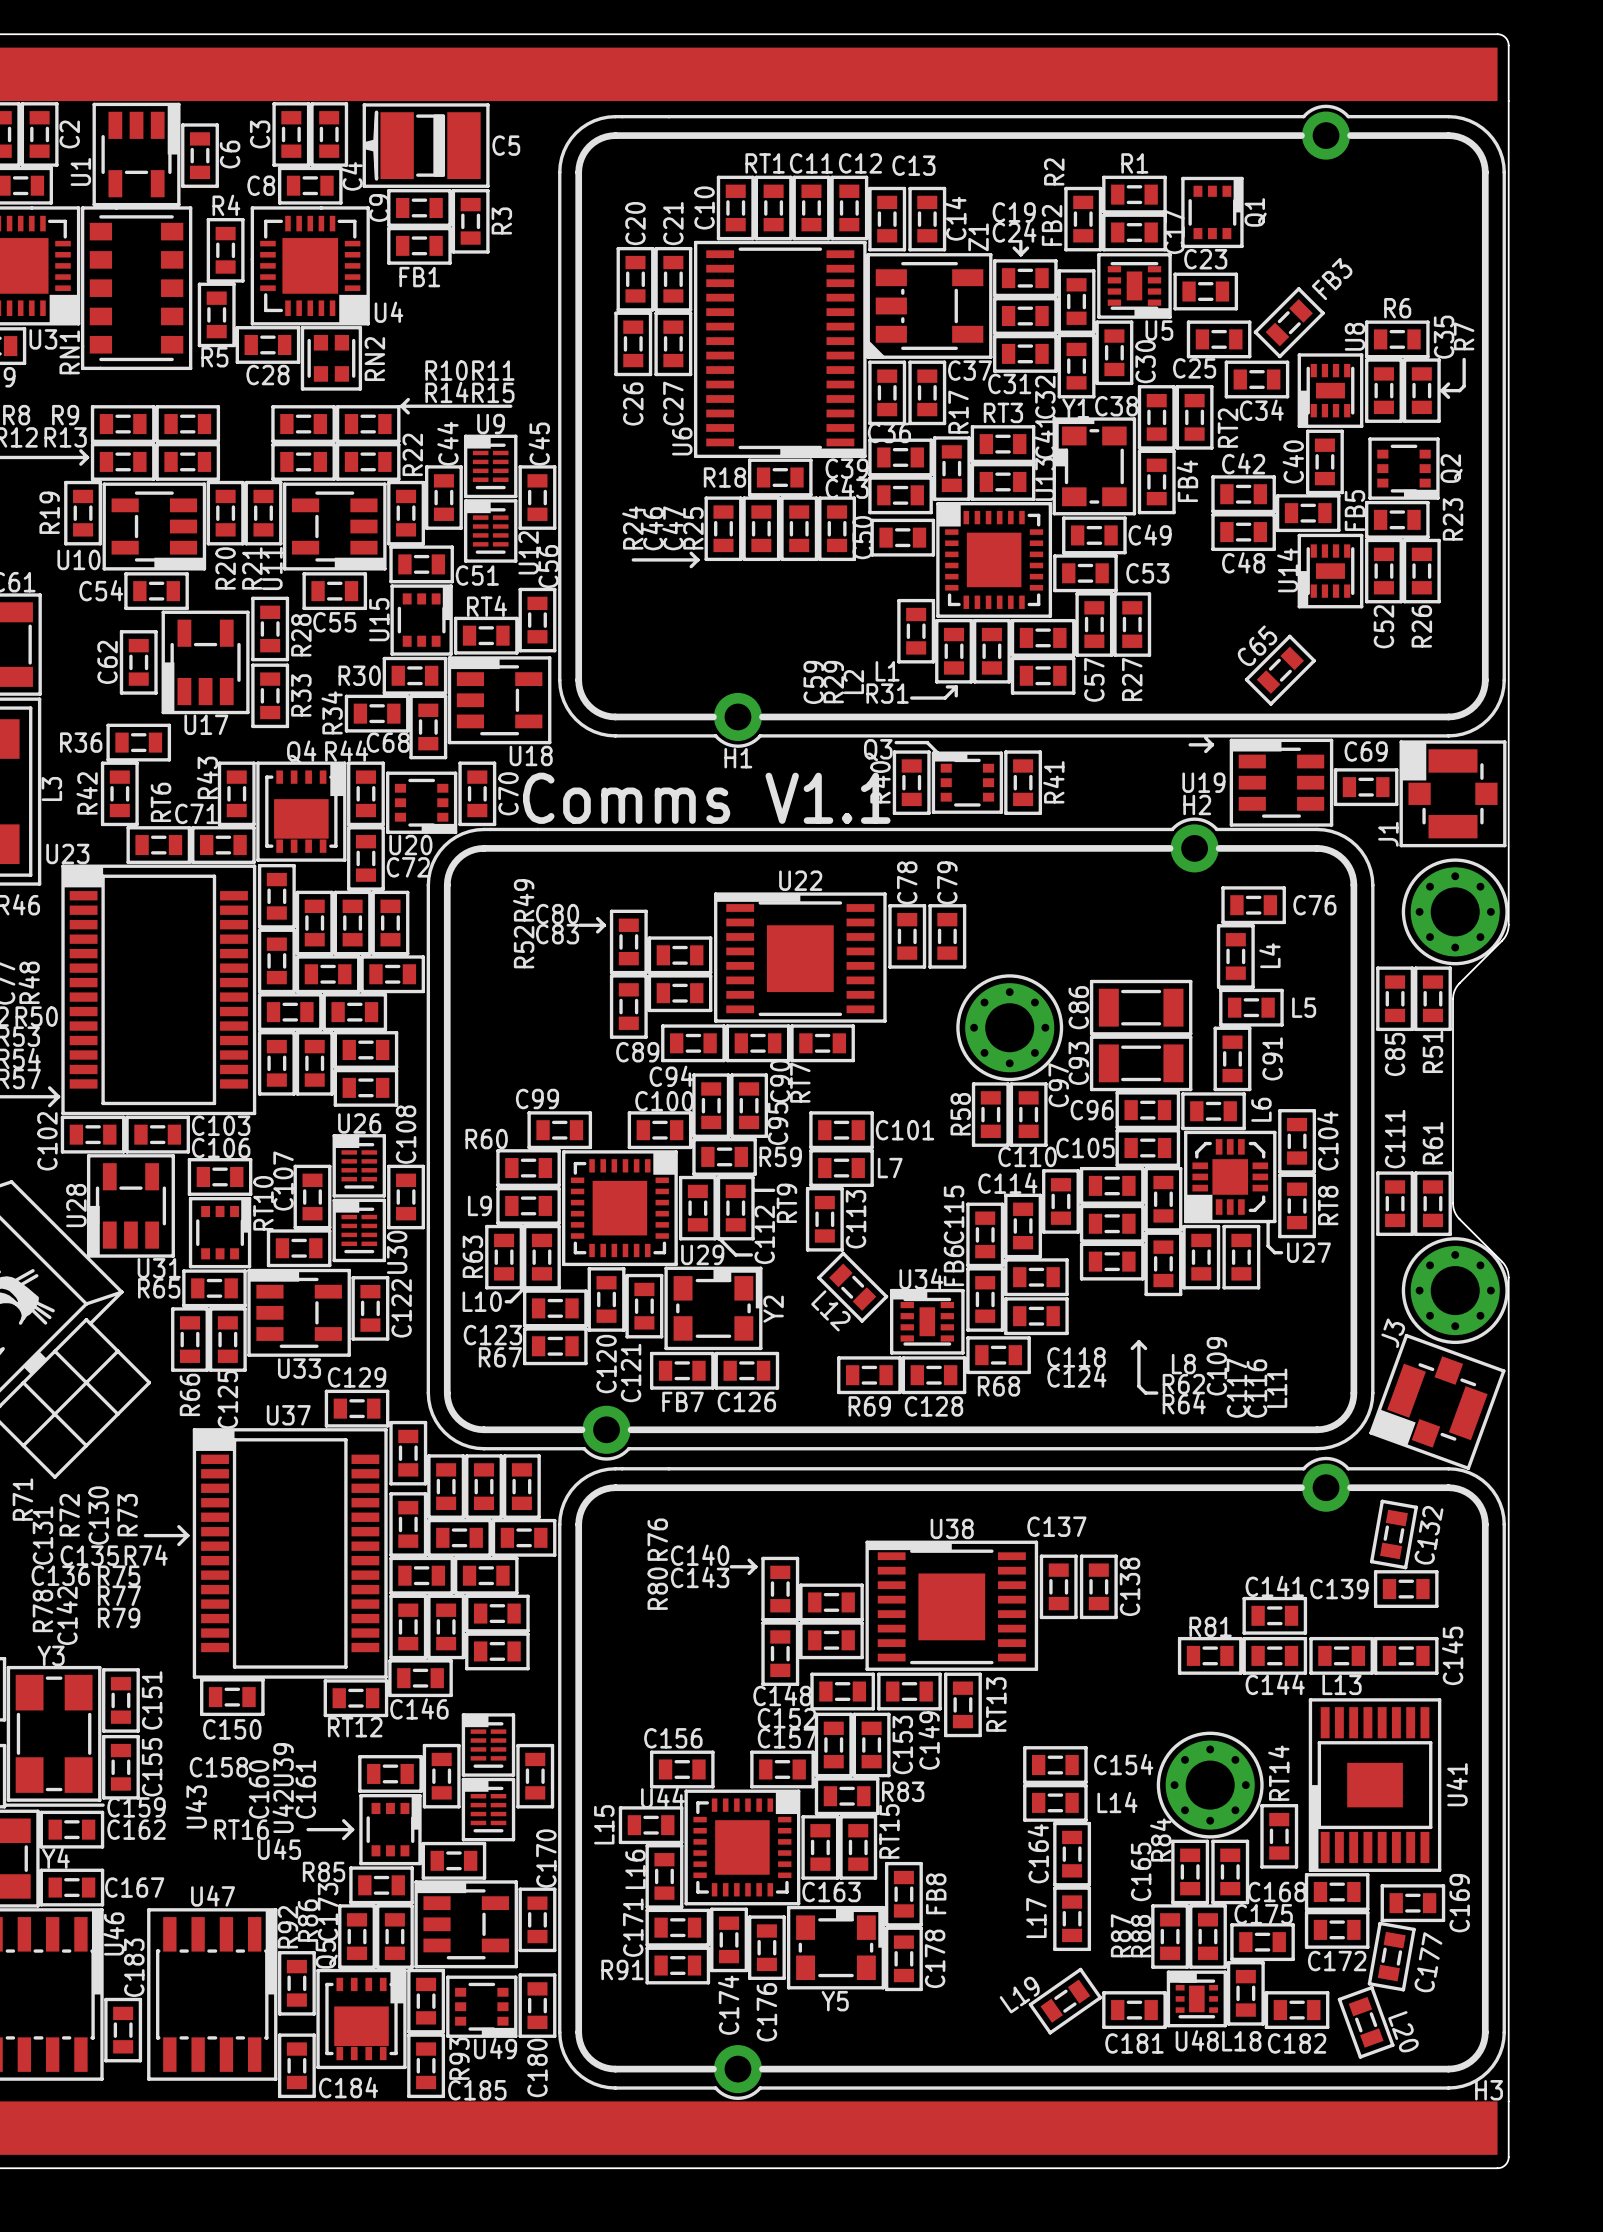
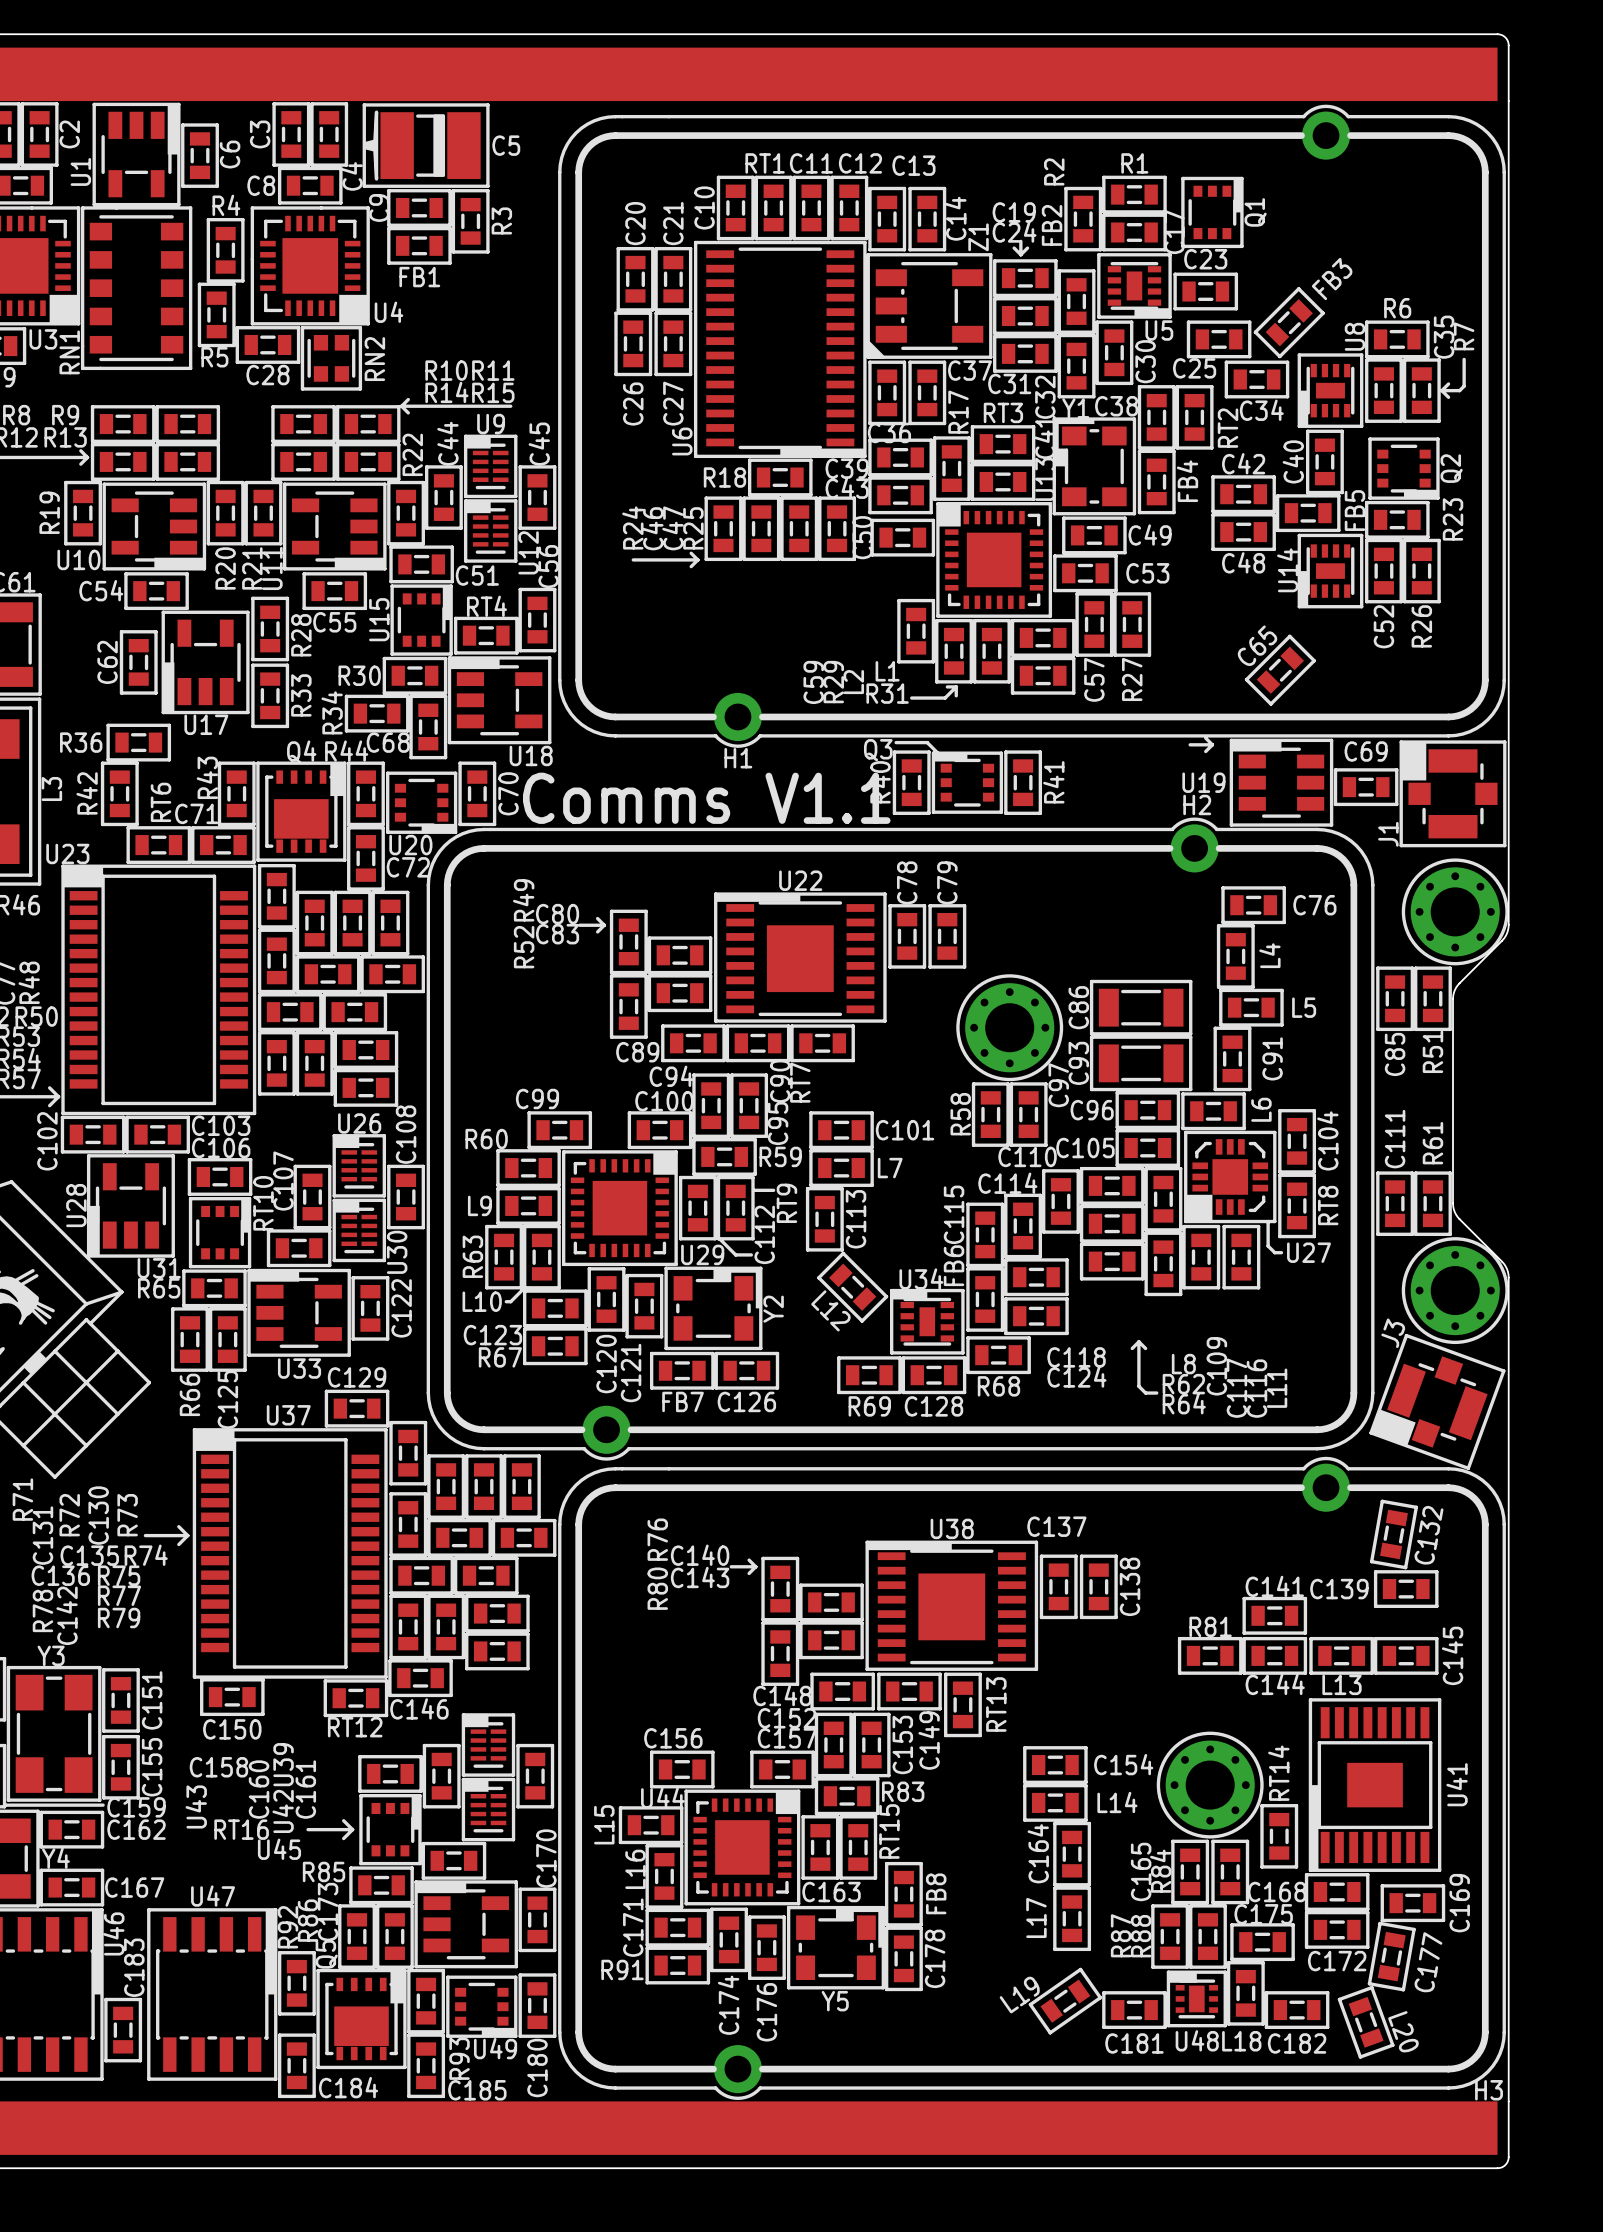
R84 name position: R84 (1160, 1840) -> R84 (1160, 1871)

